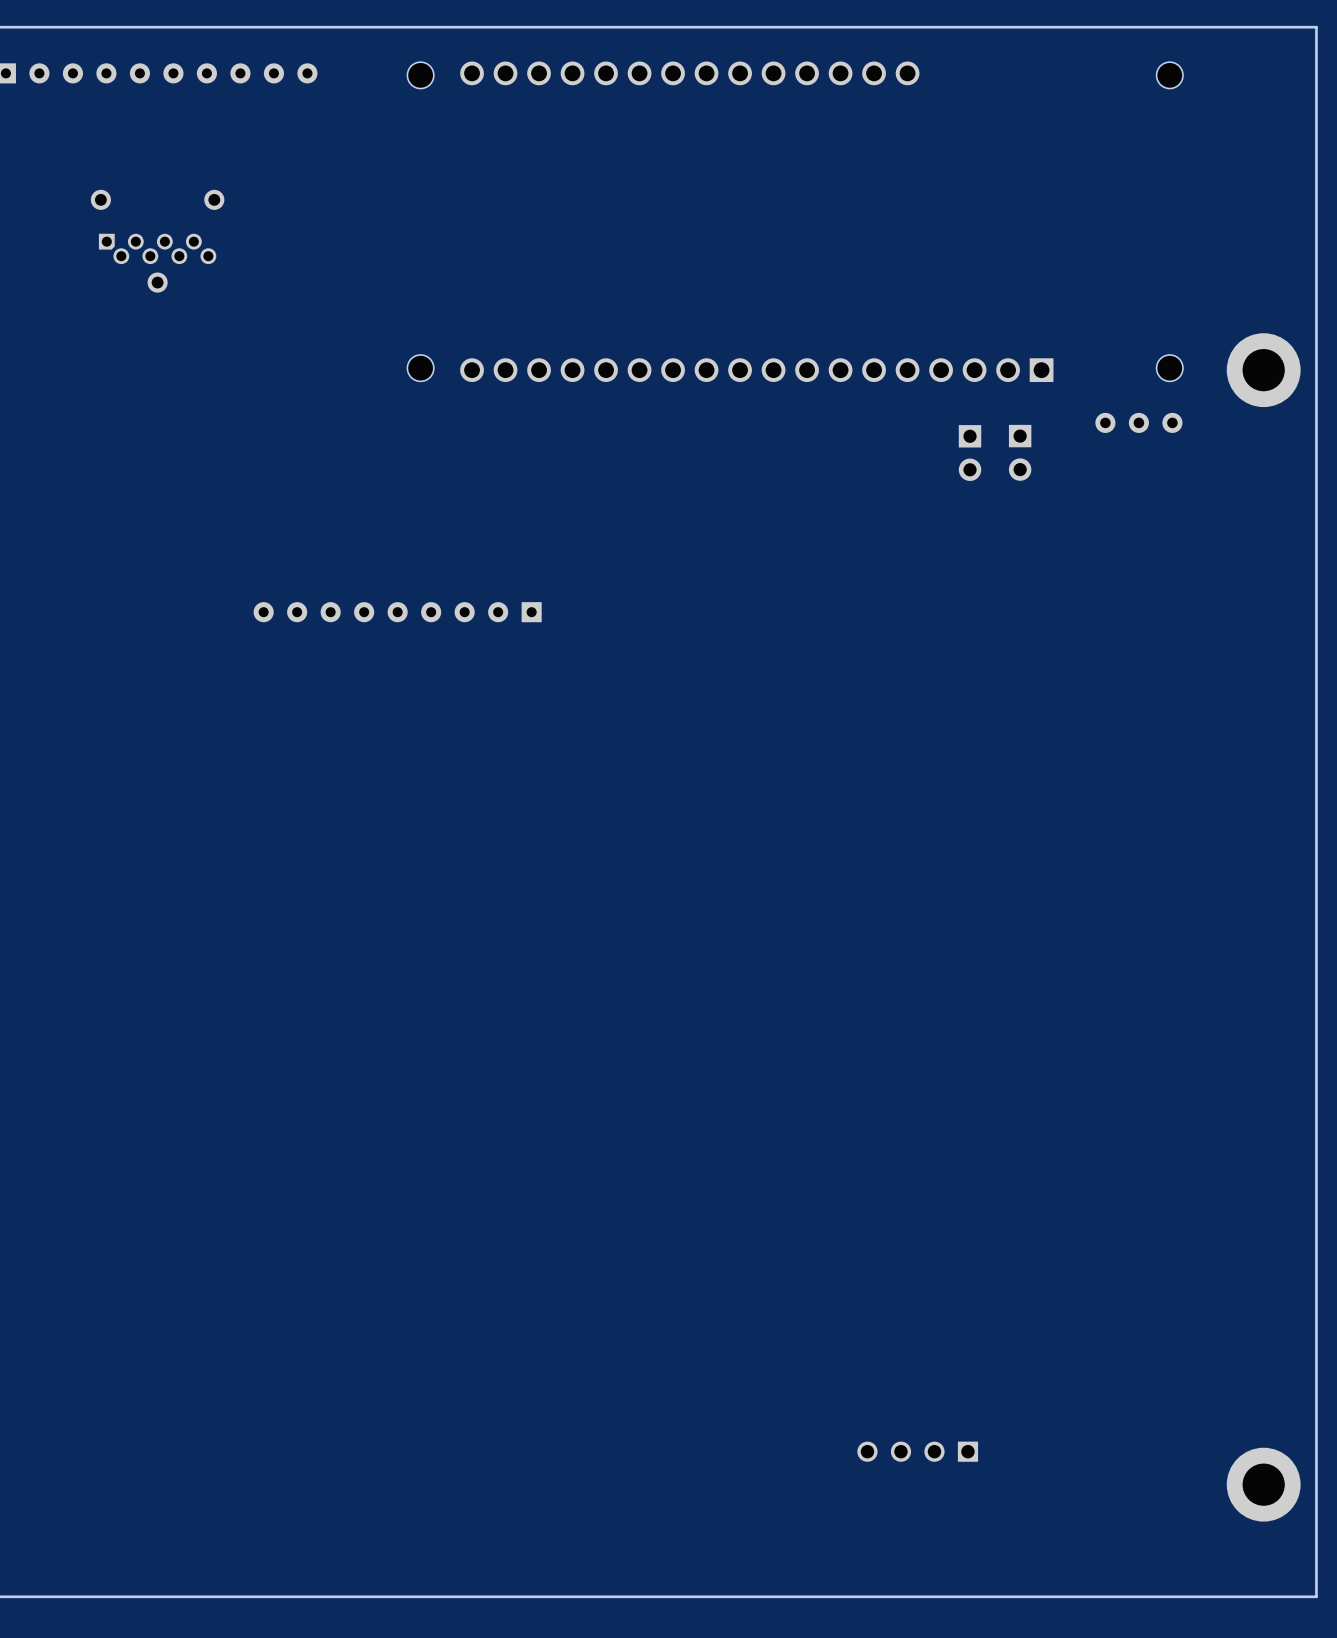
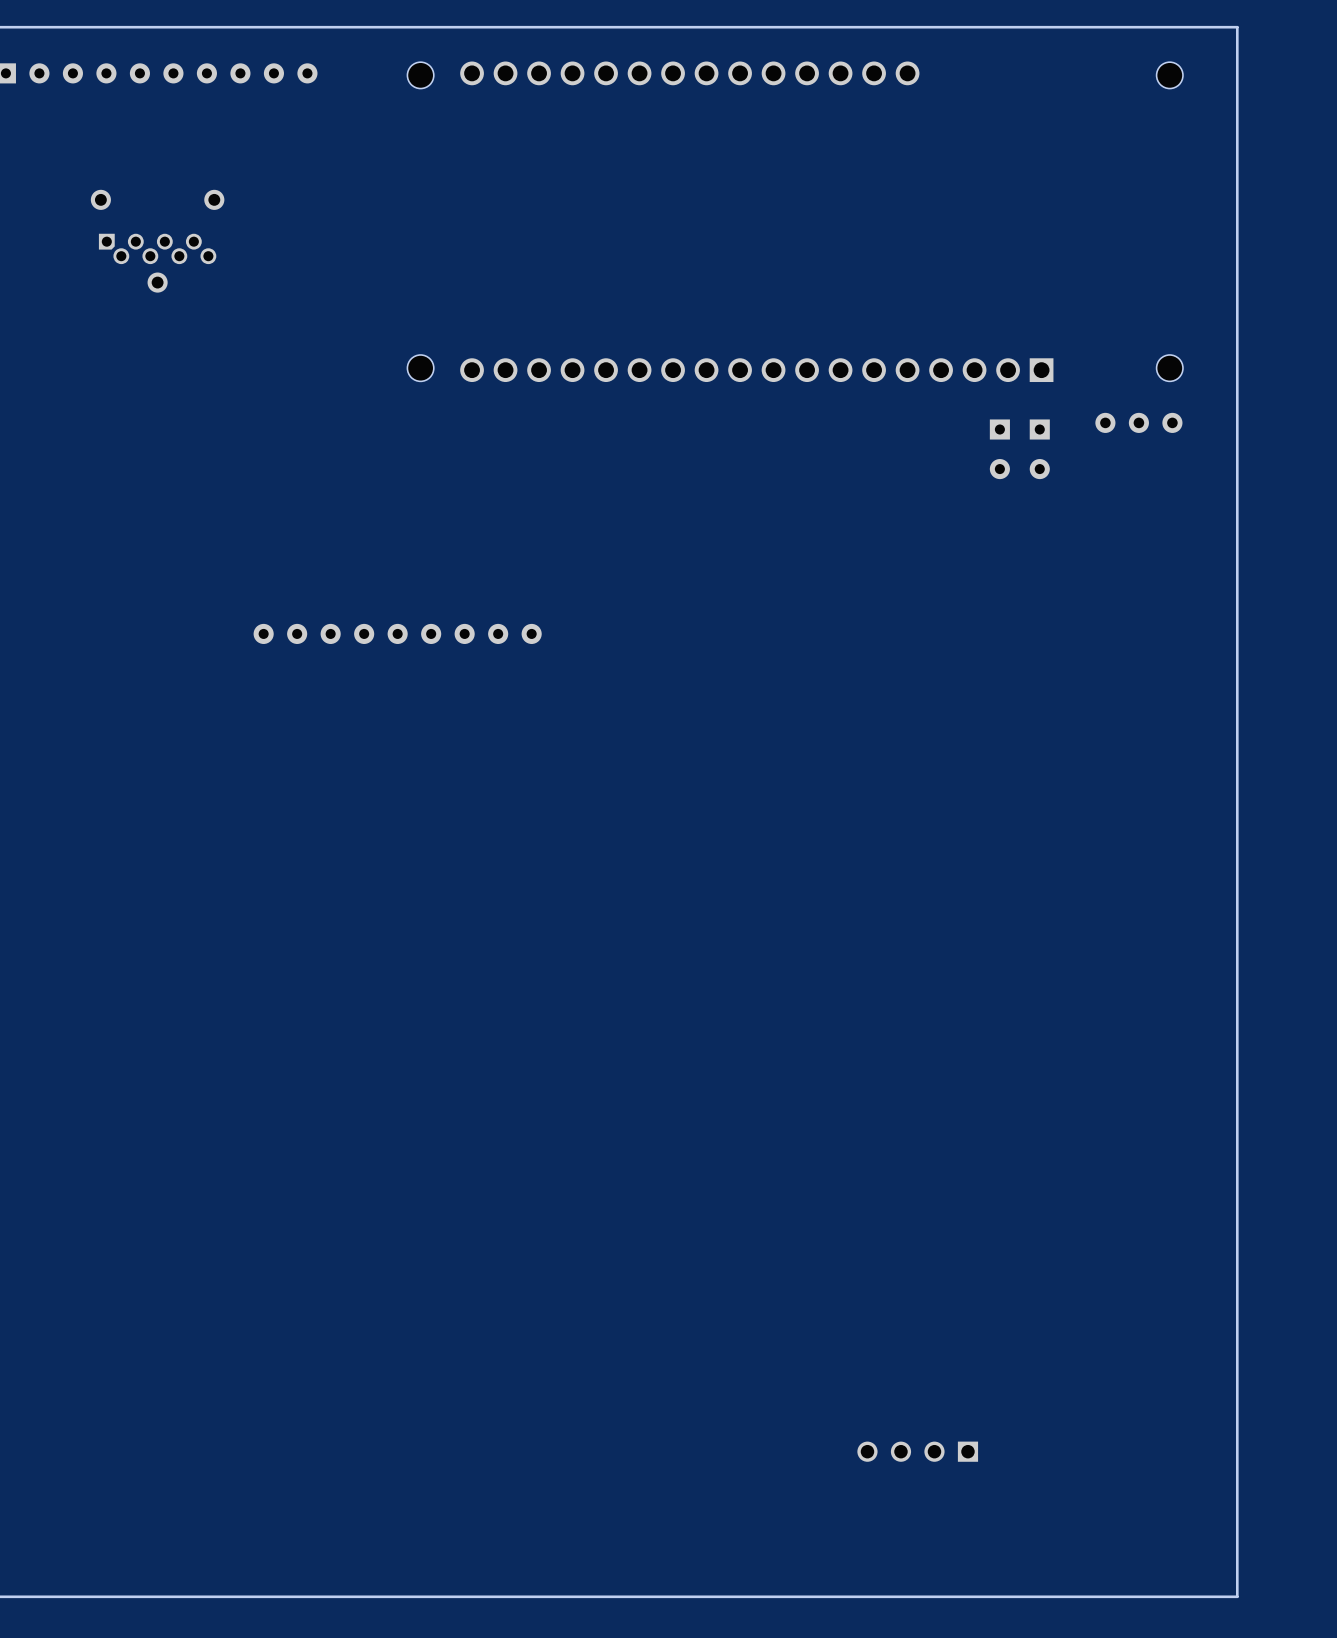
board edge: (1237, 27) (1316, 27) (1316, 1596) (1237, 1596) -> (1237, 27) (1237, 1596)
part: (1263, 370) -> none
part: none -> (999, 449)
part: none -> (1039, 449)
part: (1020, 452) -> none
part: (970, 453) -> none
part: (397, 612) -> none
part: none -> (397, 633)
part: (1263, 1484) -> none

